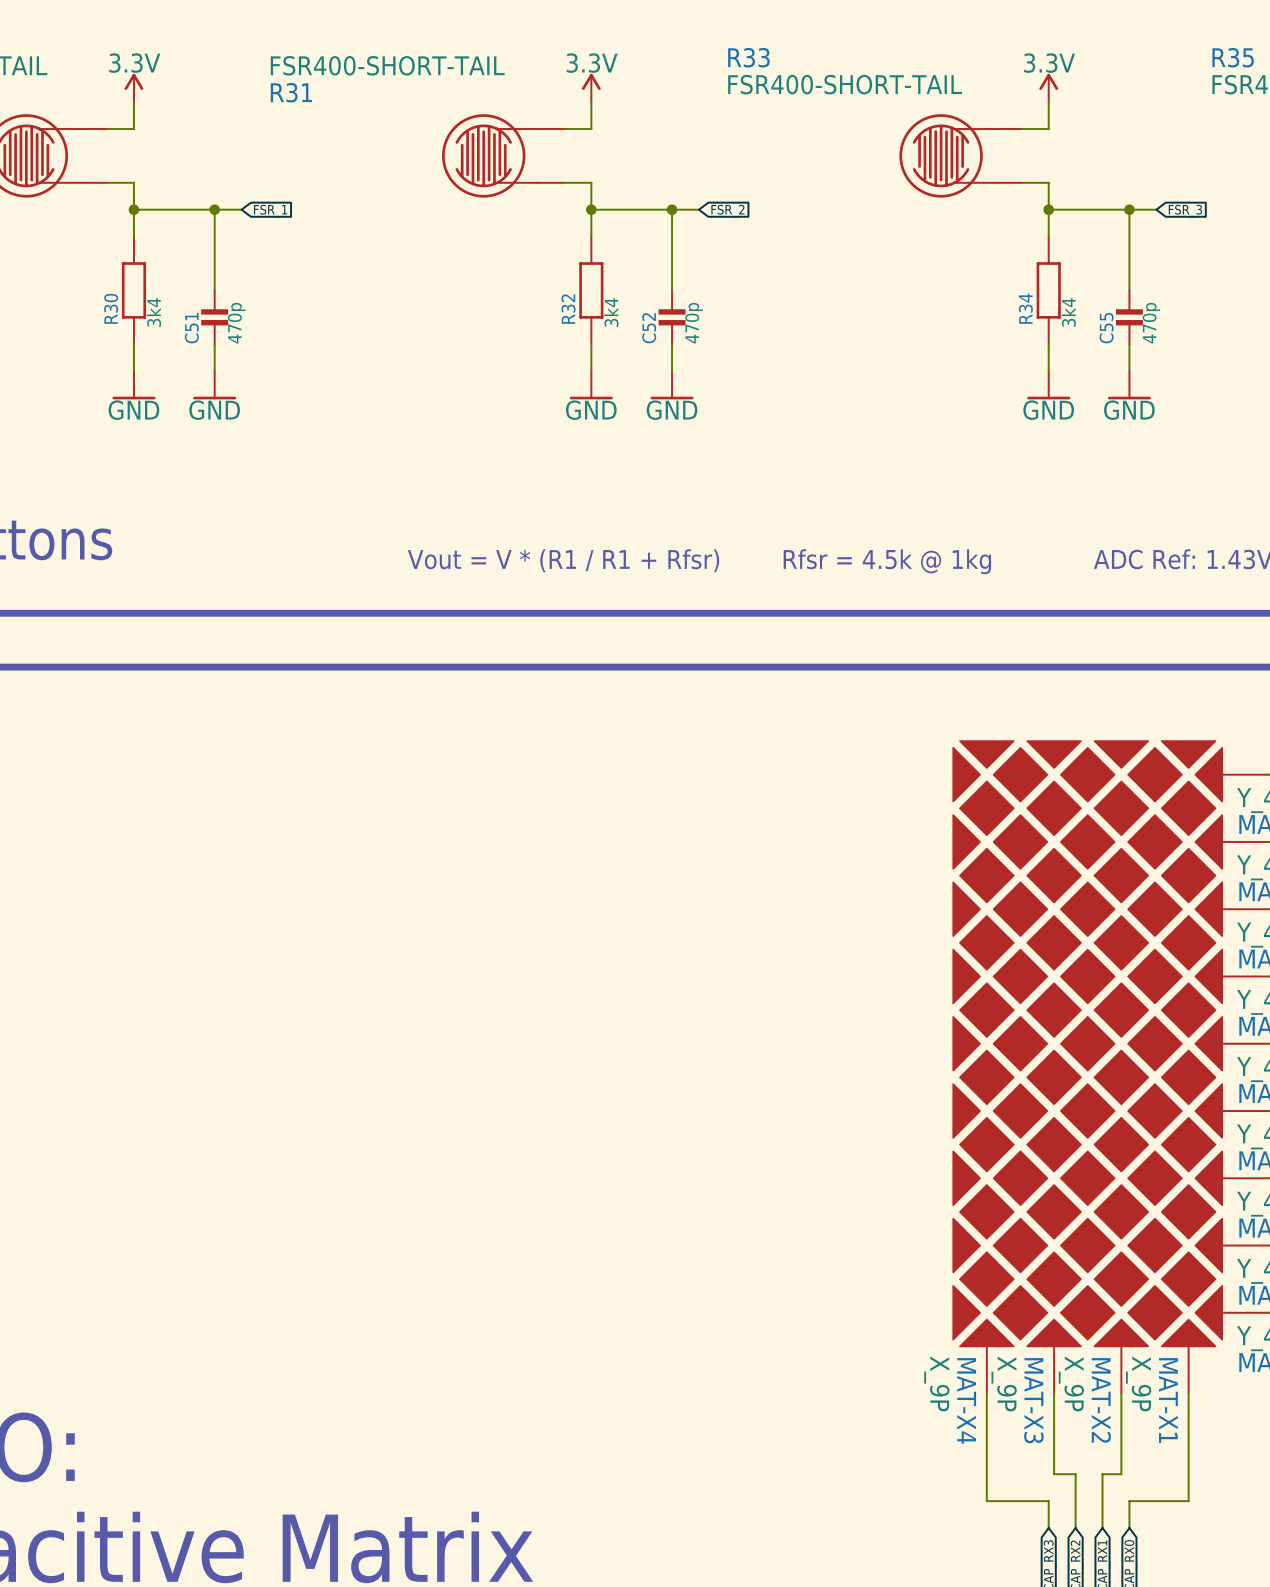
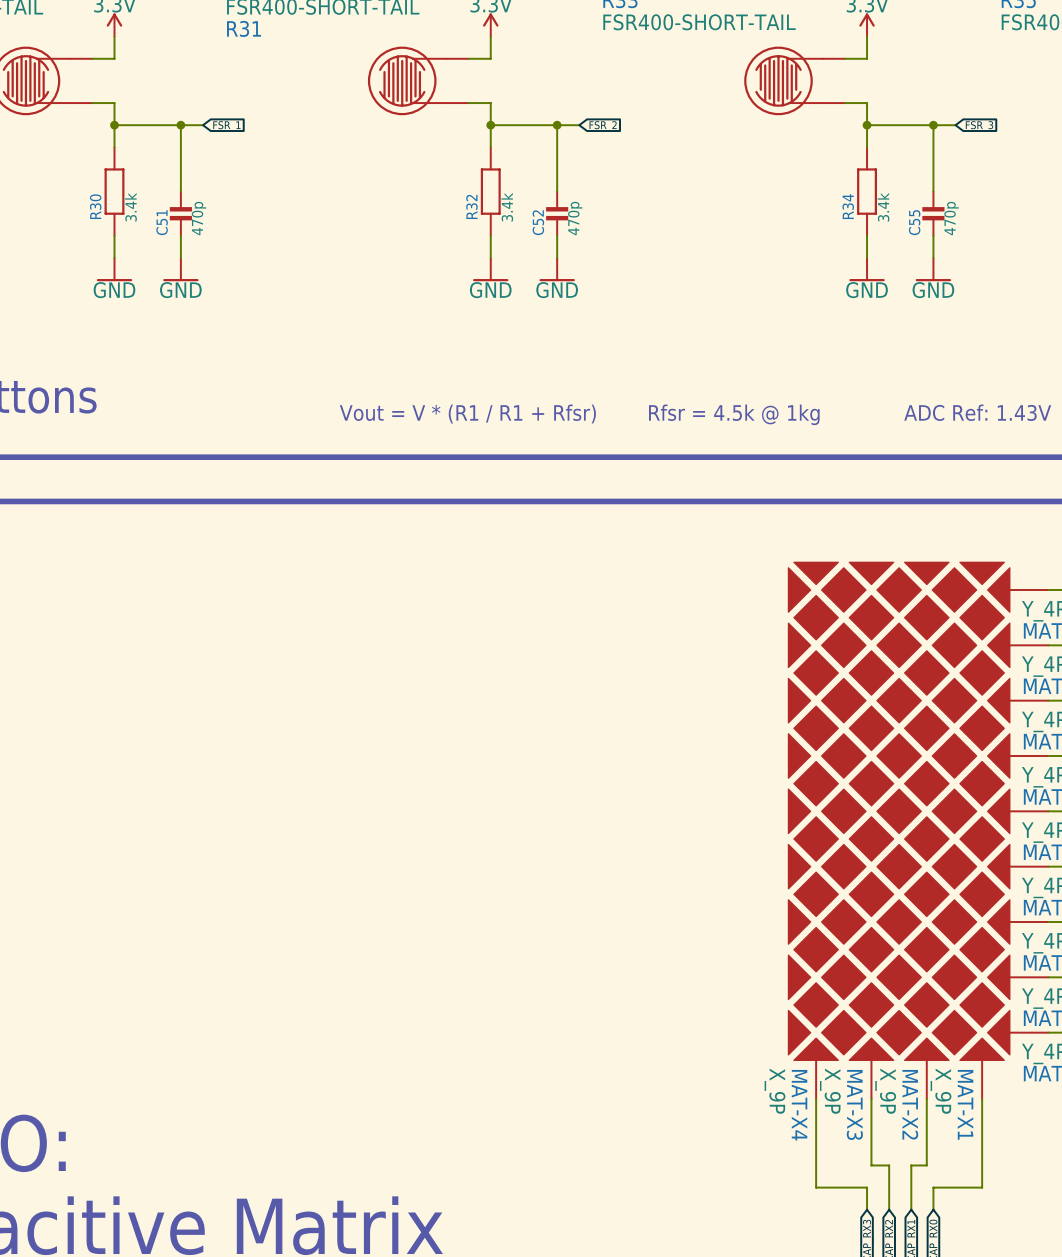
R30 value: 3k4 (153, 312) -> 3.4k (130, 207)
R32 value: 3k4 (611, 312) -> 3.4k (507, 207)
R34 value: 3k4 (1068, 312) -> 3.4k (883, 207)

